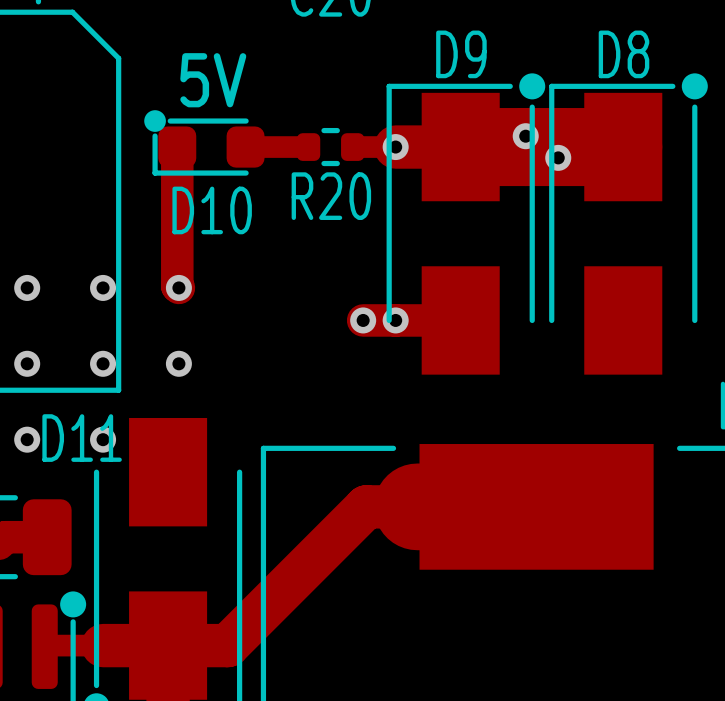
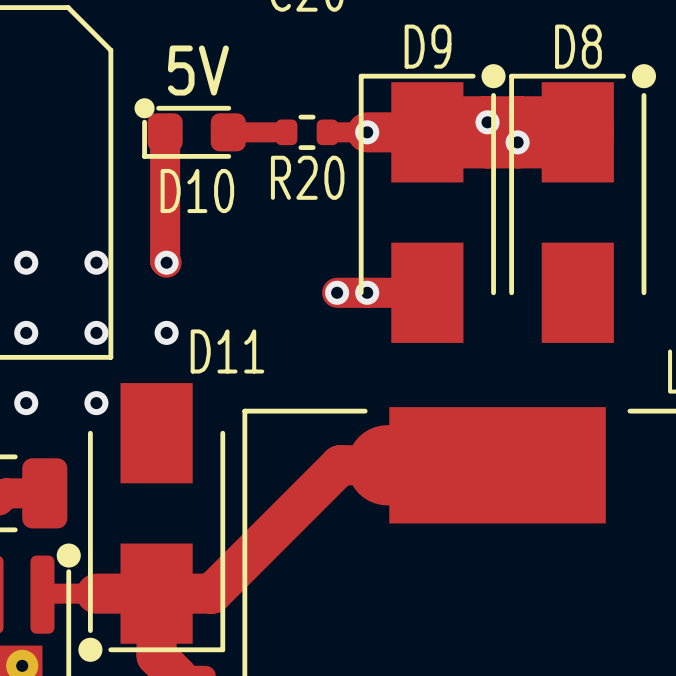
D11 name position: D11 (82, 438) -> D11 (227, 351)

